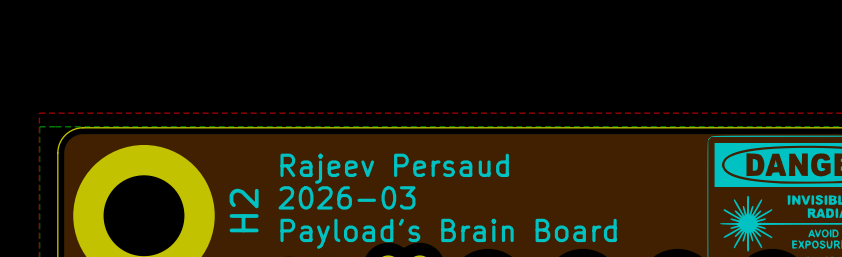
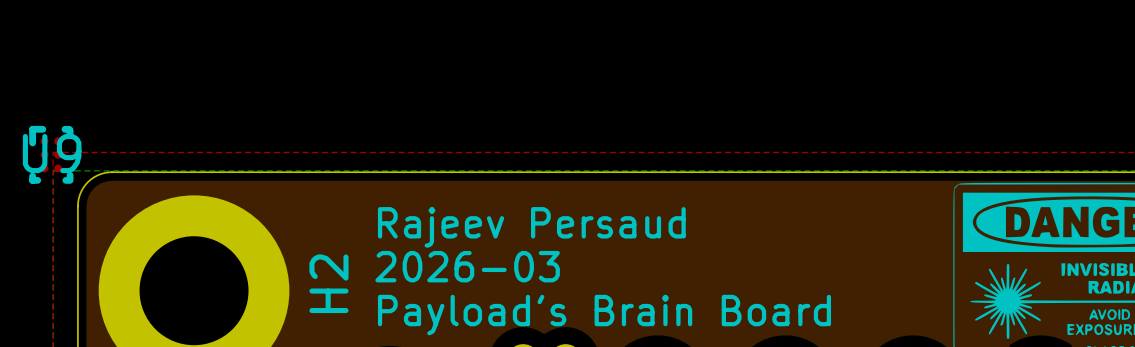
U9: none -> (51, 154)

